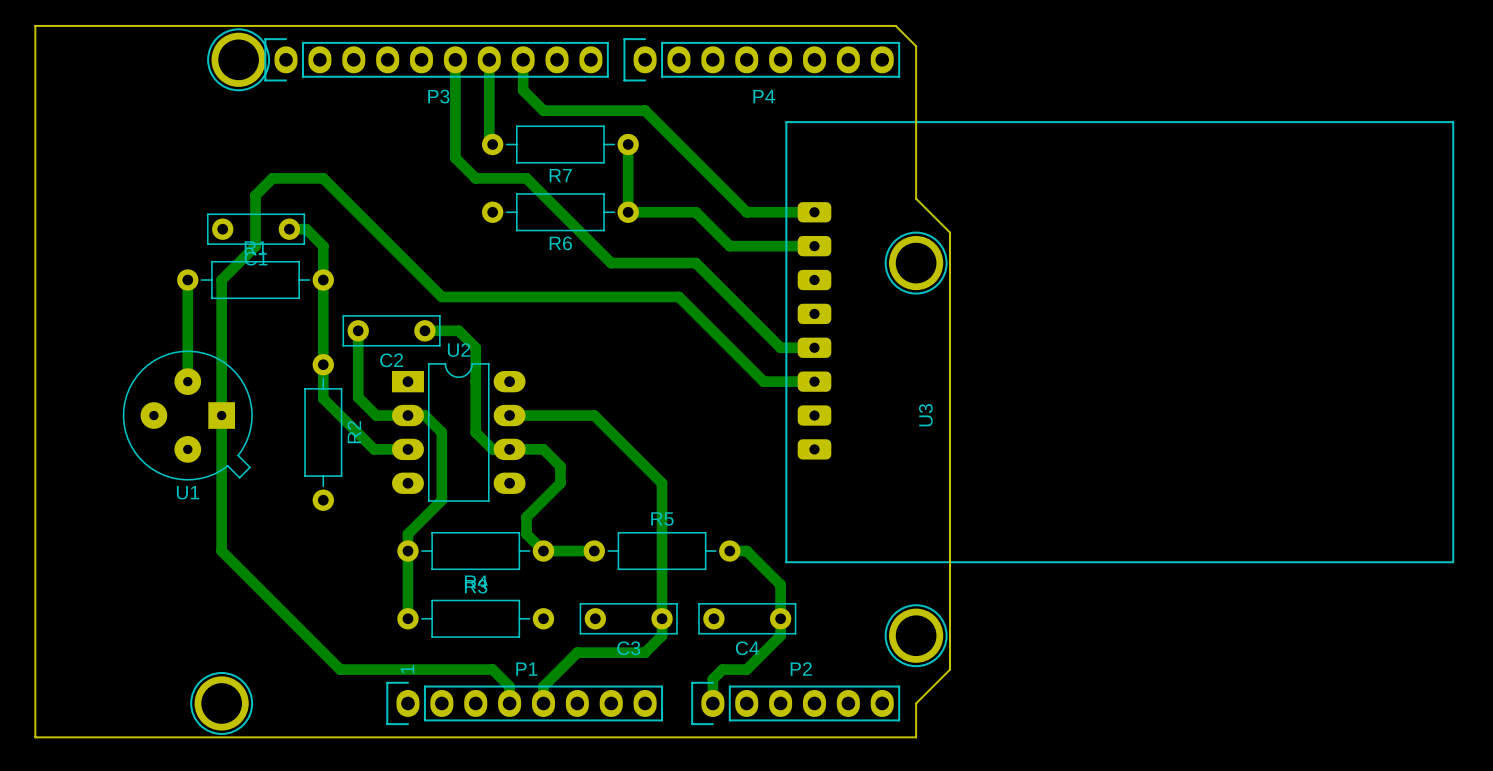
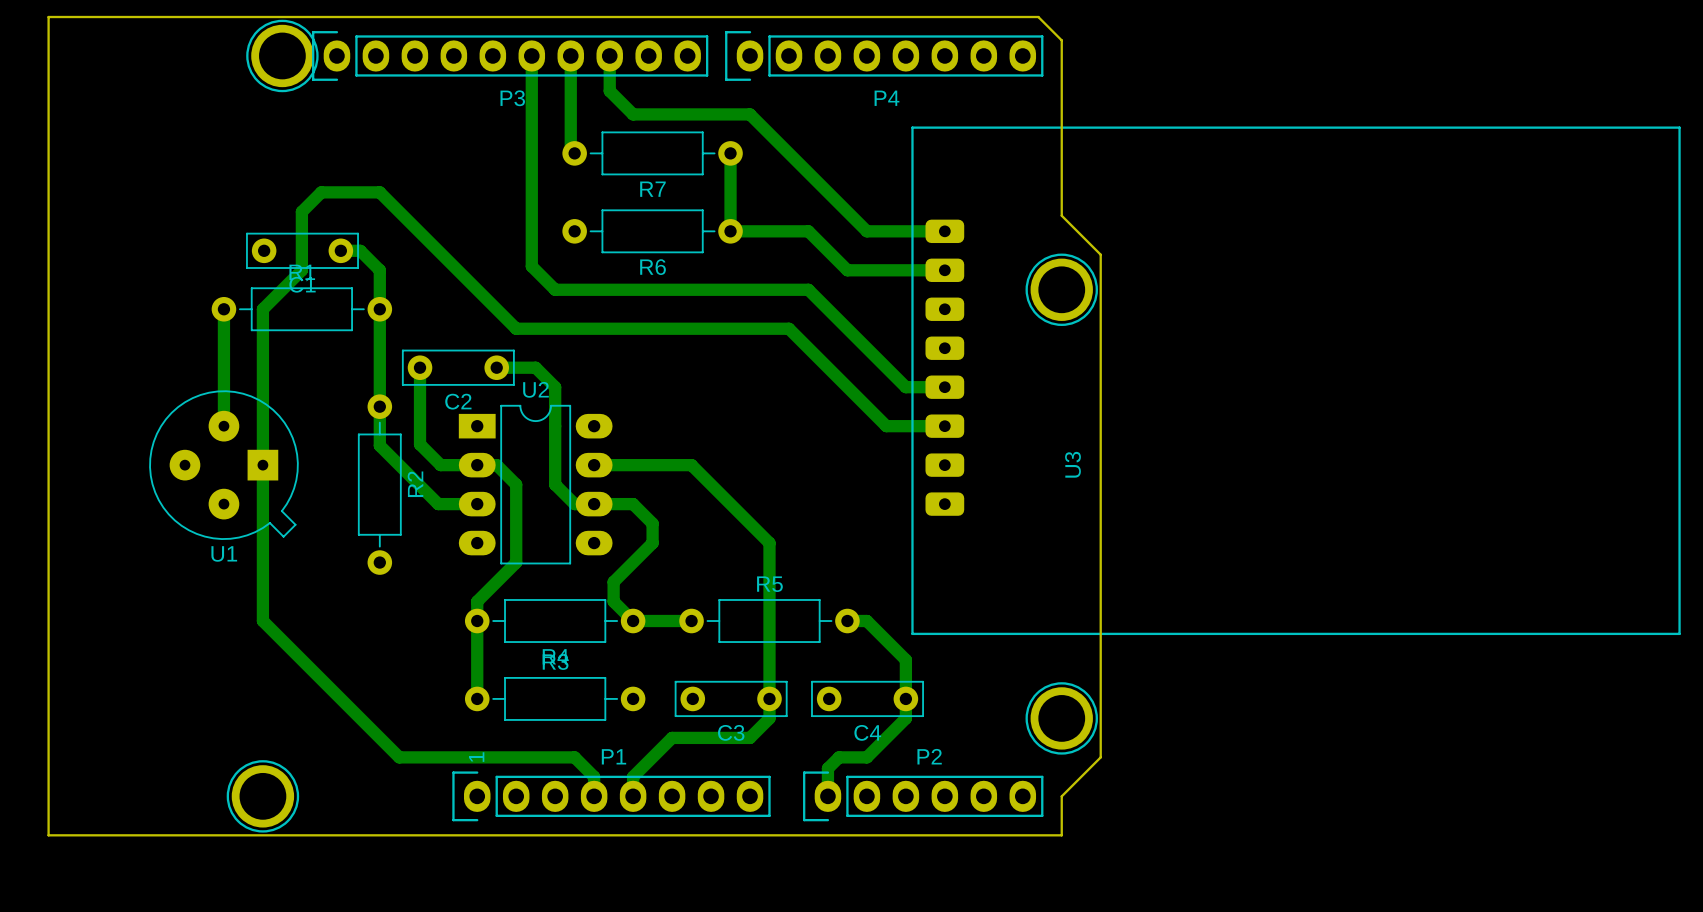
bottom track: (455, 158) (475, 178) (526, 178) (611, 263) -> (531, 168) (531, 266) (555, 289) (711, 289)

